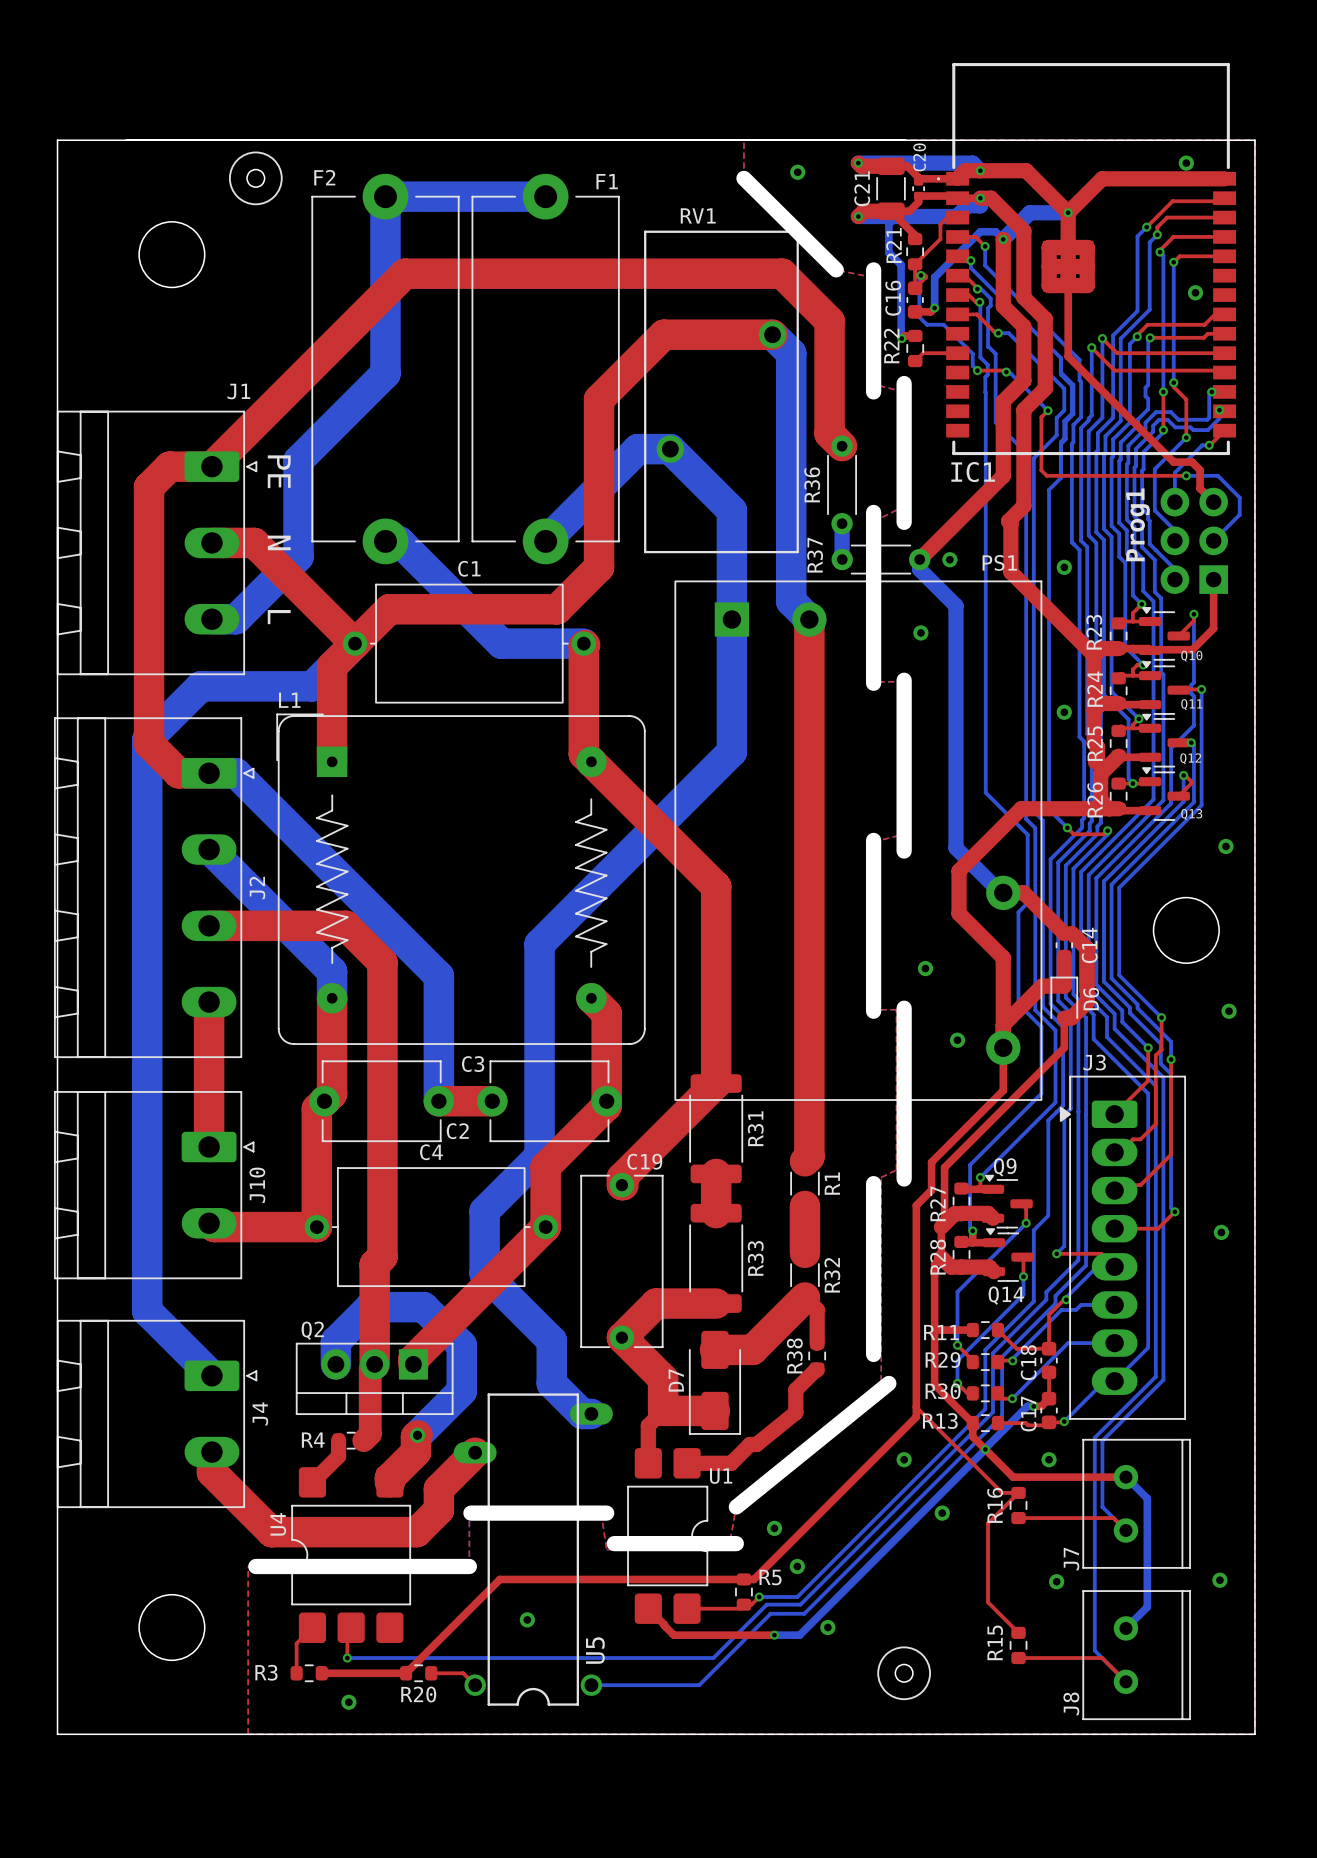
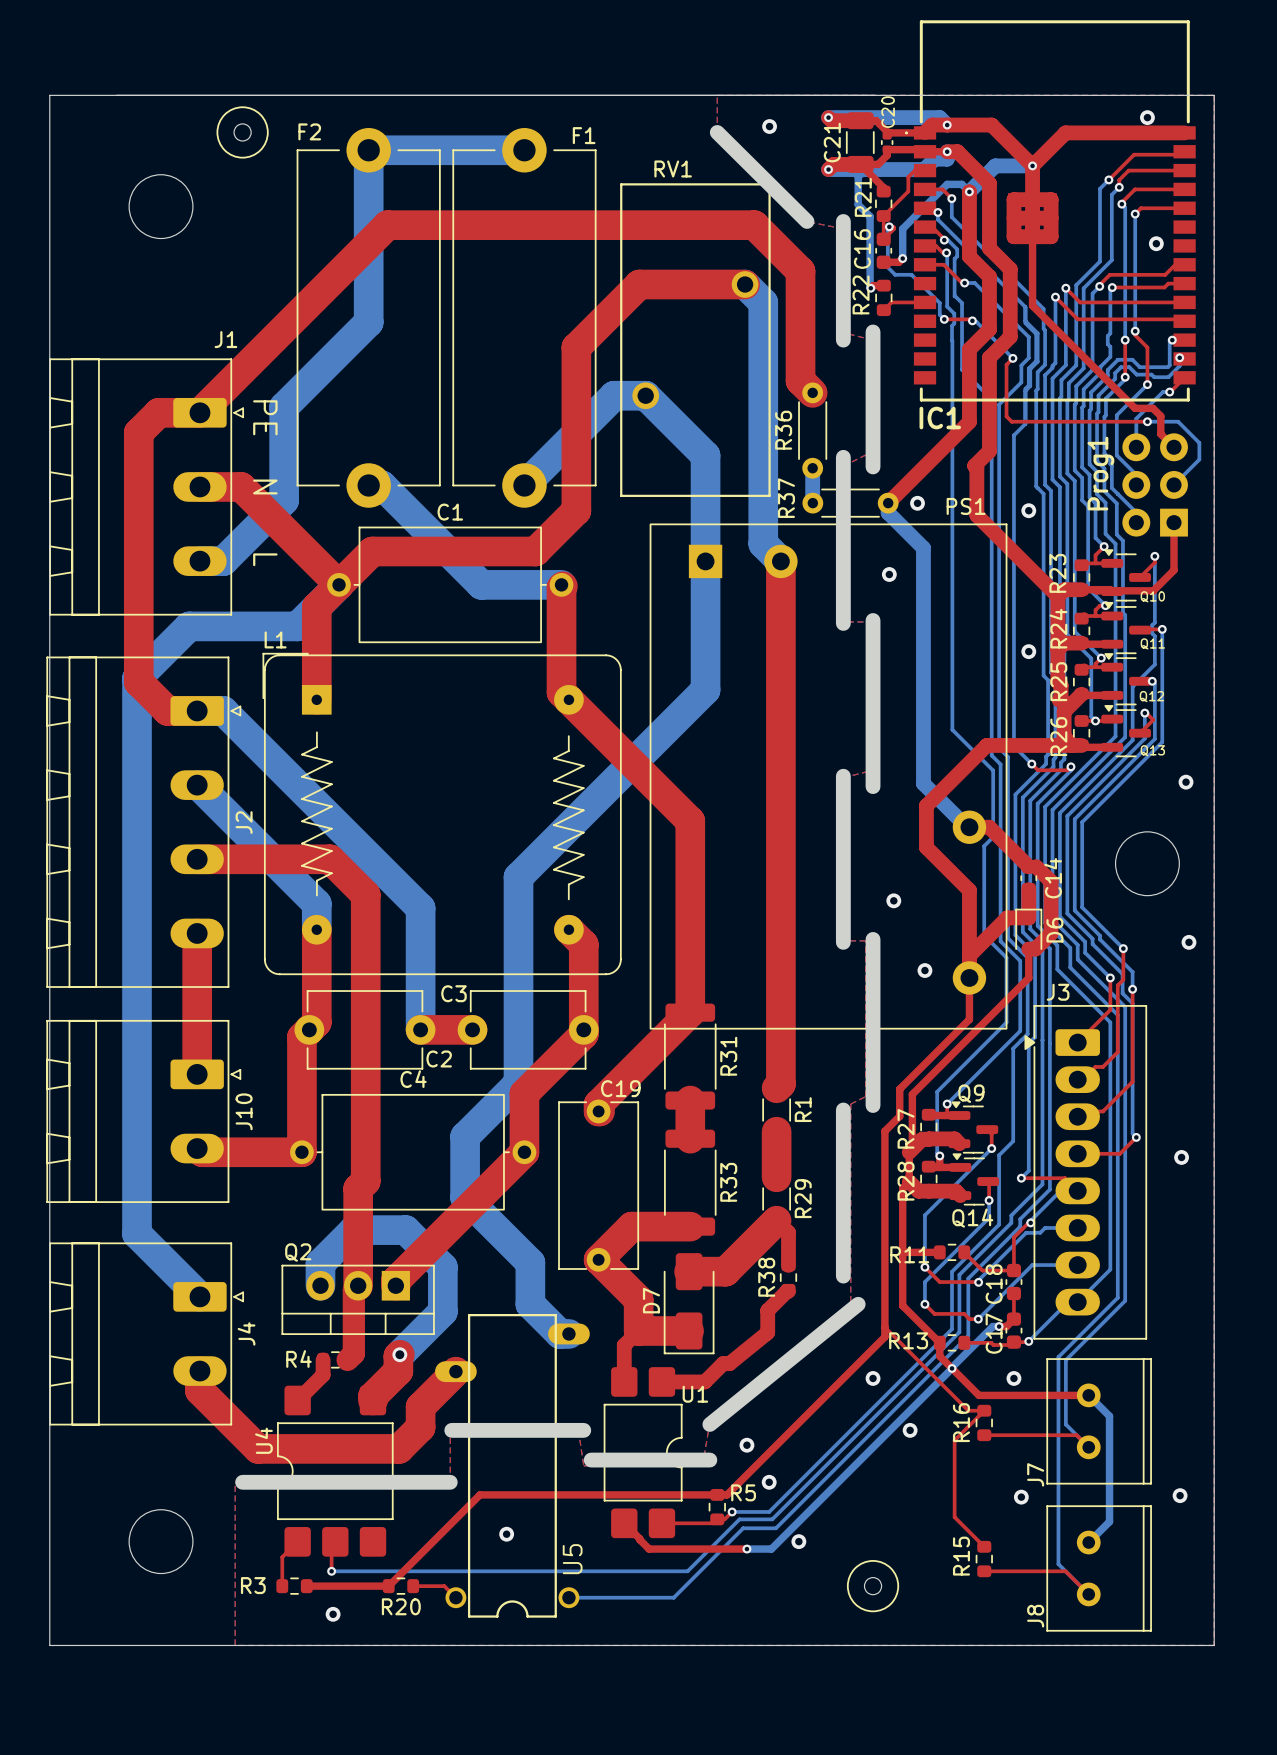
R32 name: R32 (832, 1275) -> R29 (803, 1198)
top track: none -> (939, 1282) (965, 1282)
R29: (985, 1362) -> none
top track: none -> (939, 1313) (964, 1313)
R30: (985, 1393) -> none

